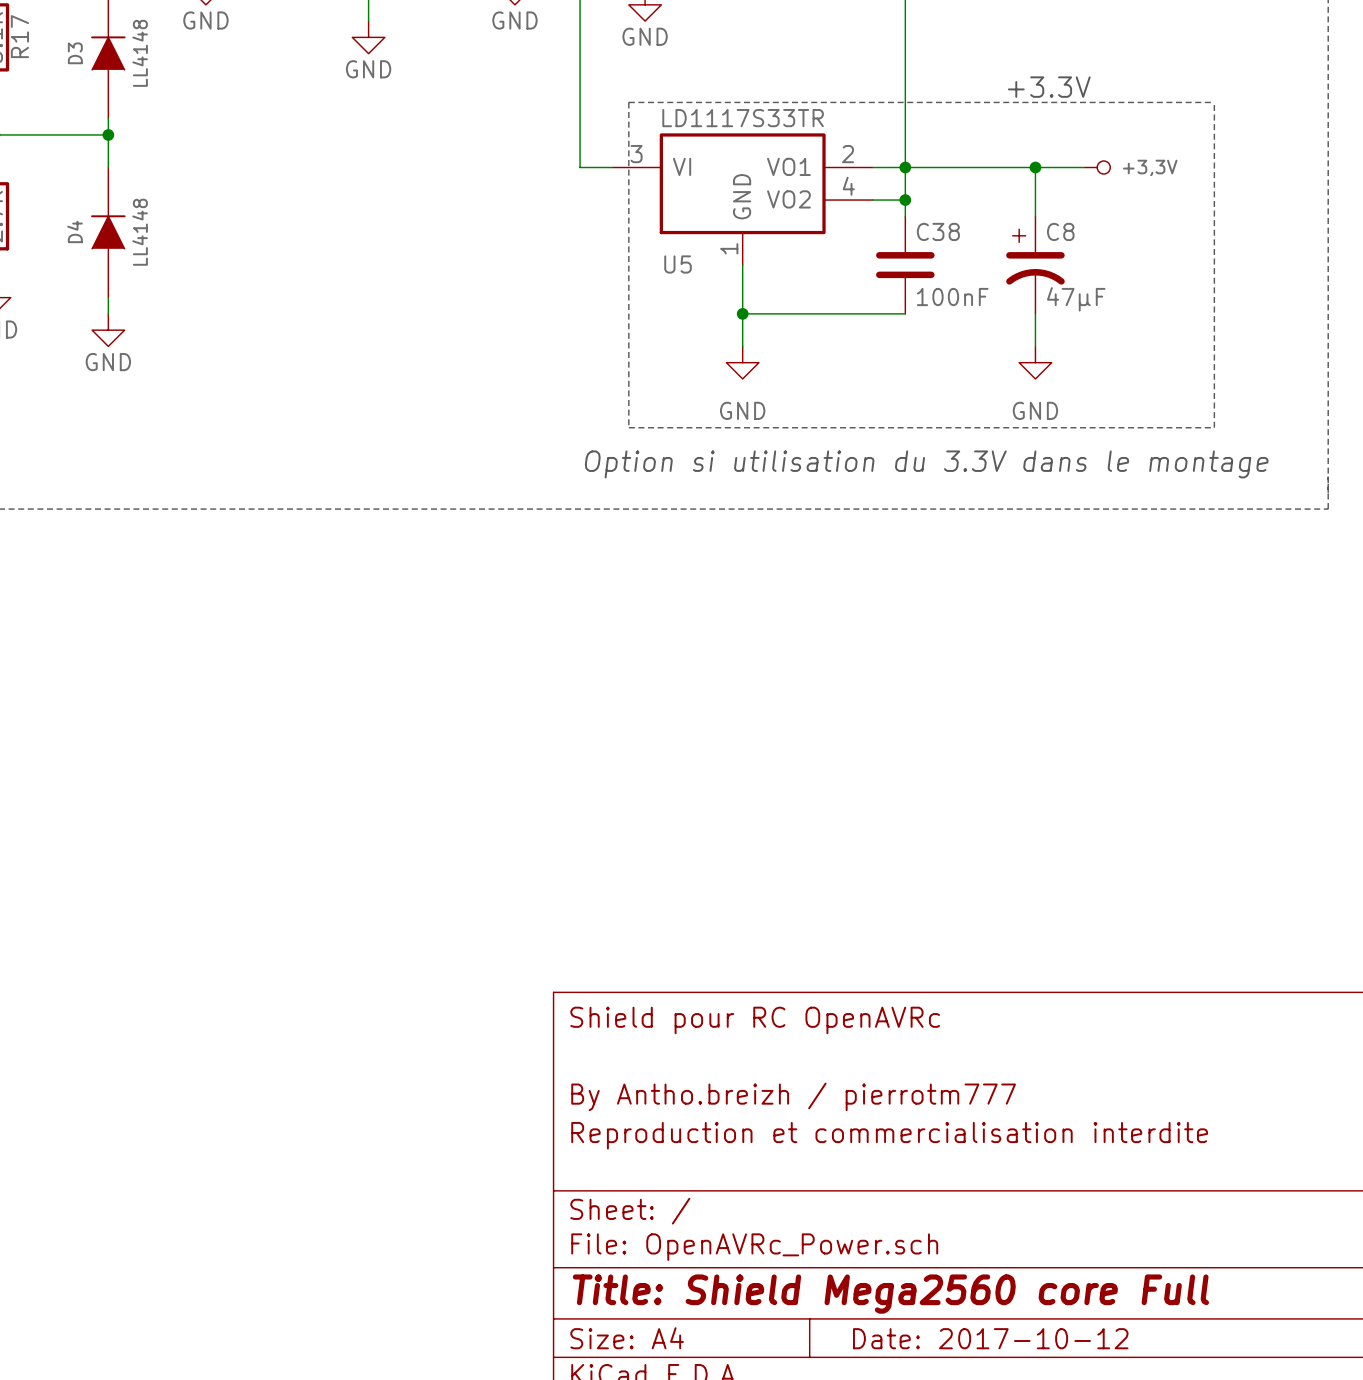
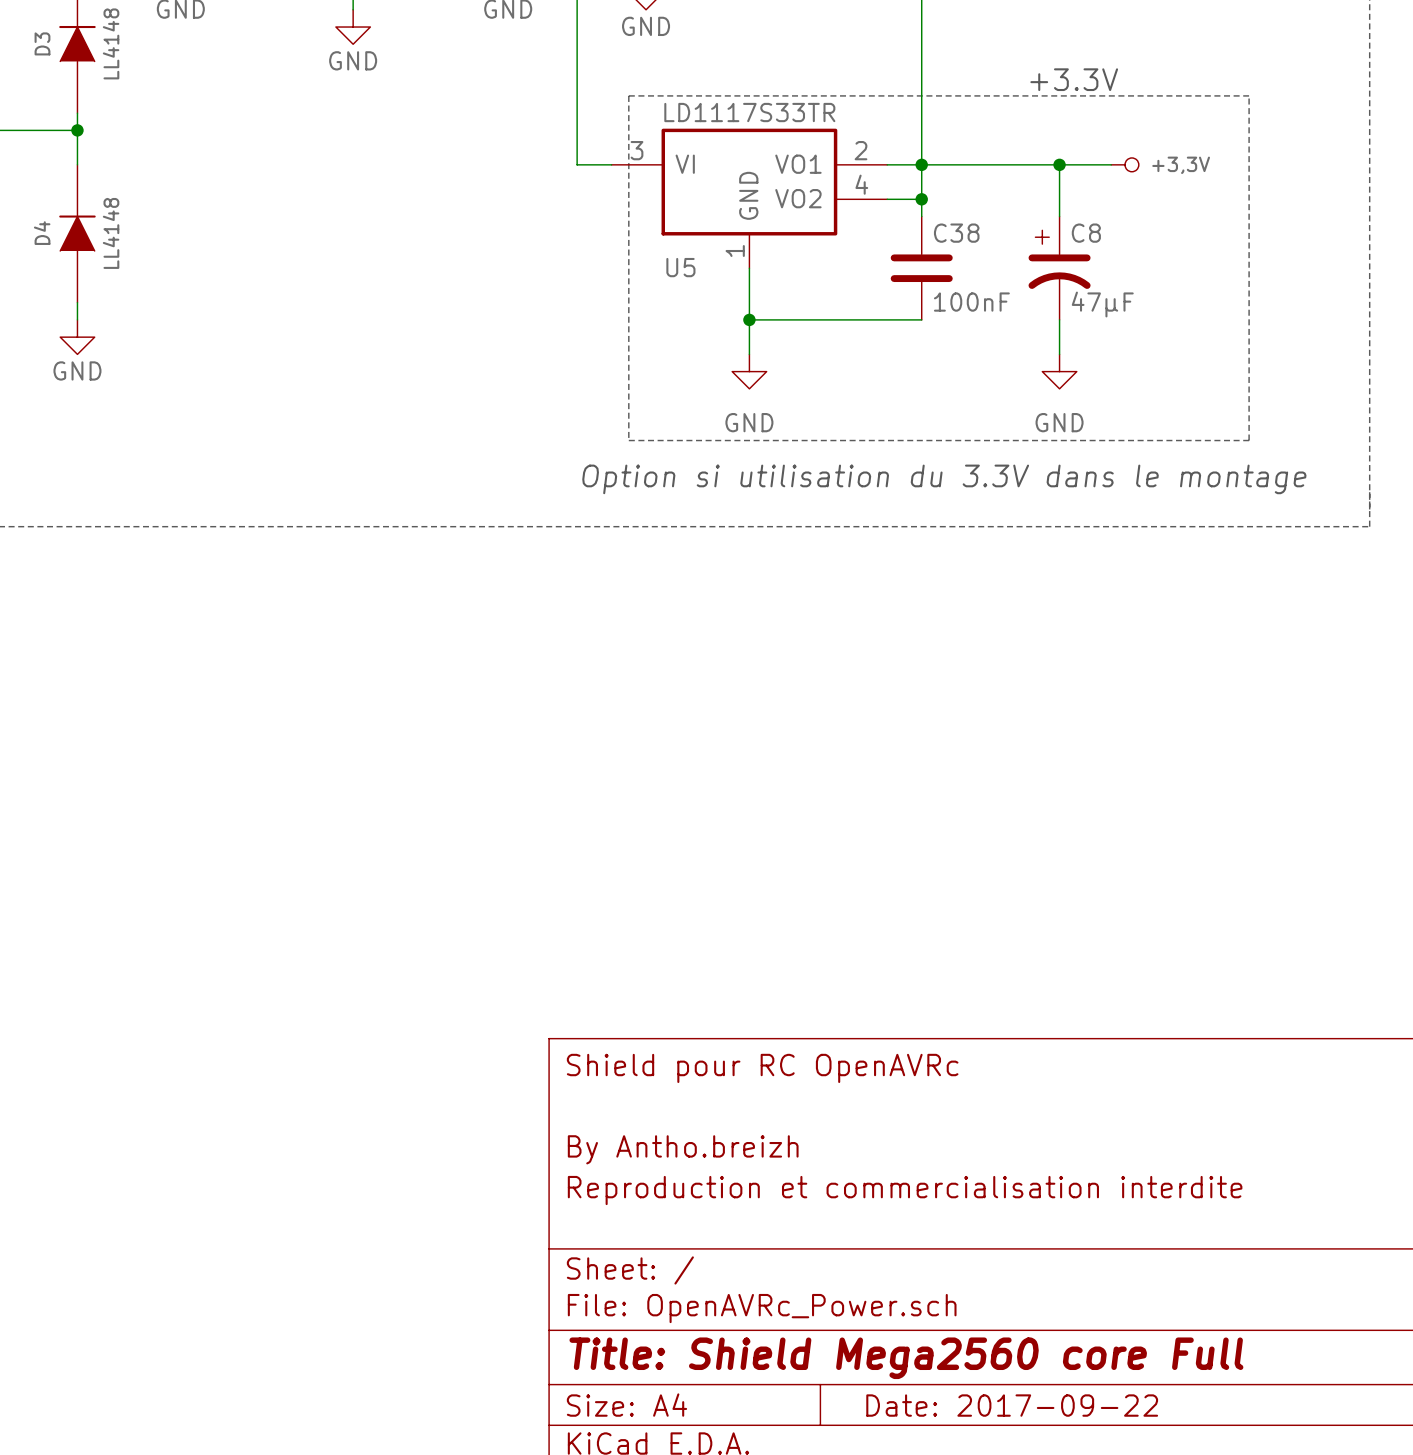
title block: By Antho.breizh / pierrotm777 (793, 1096) -> By Antho.breizh (683, 1149)
title block: Date: 2017-10-12 (990, 1338) -> Date: 2017-09-22 (1012, 1405)

